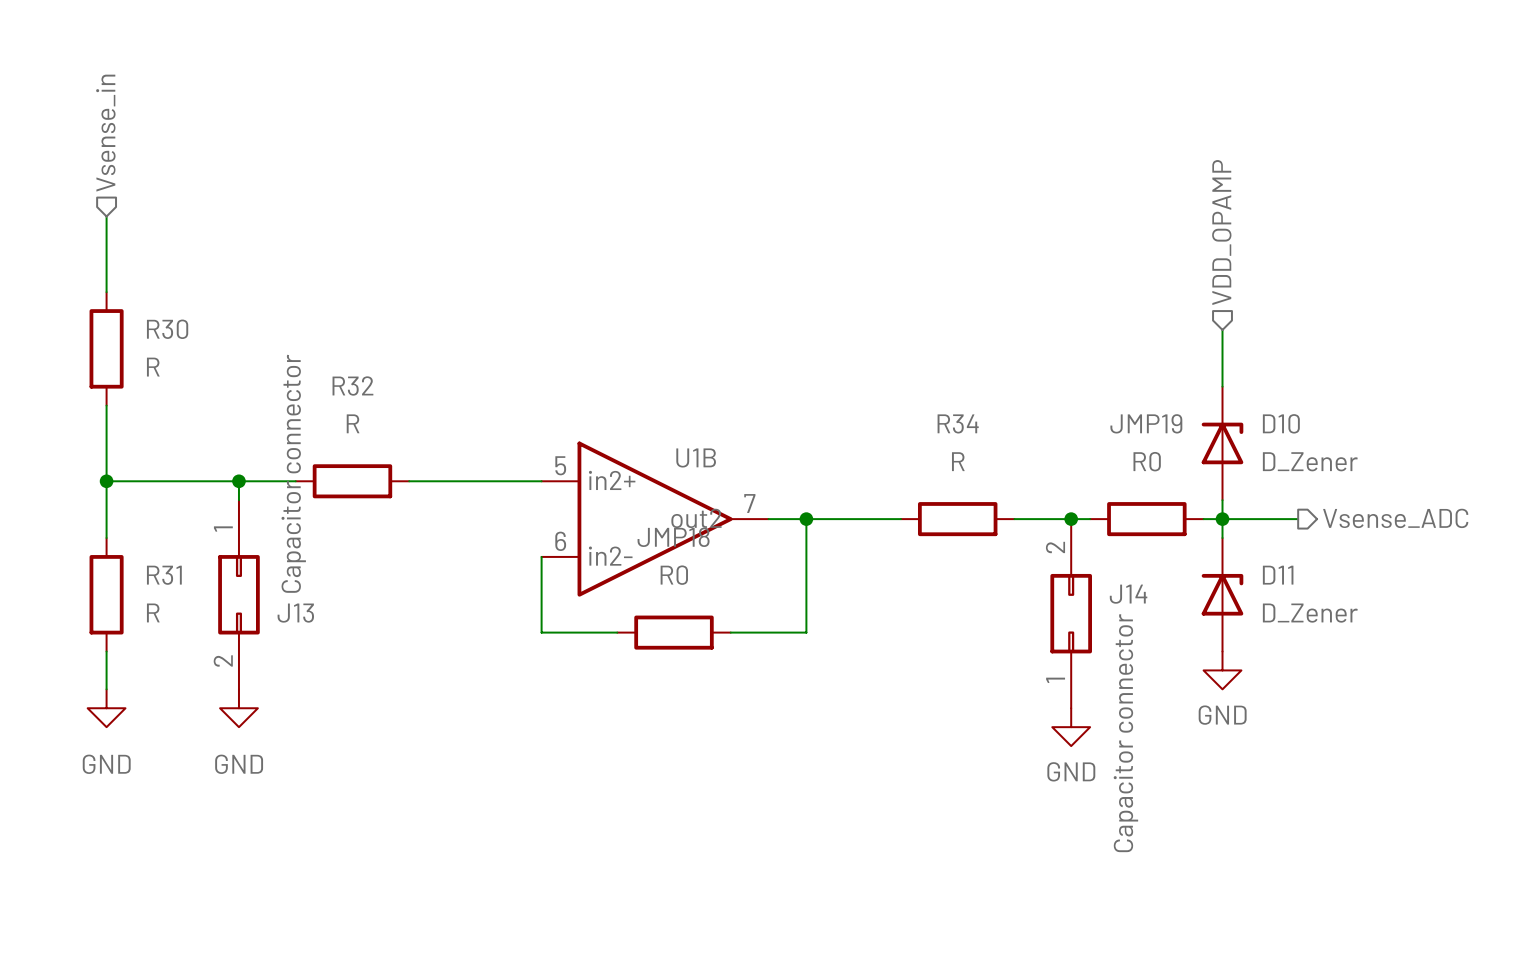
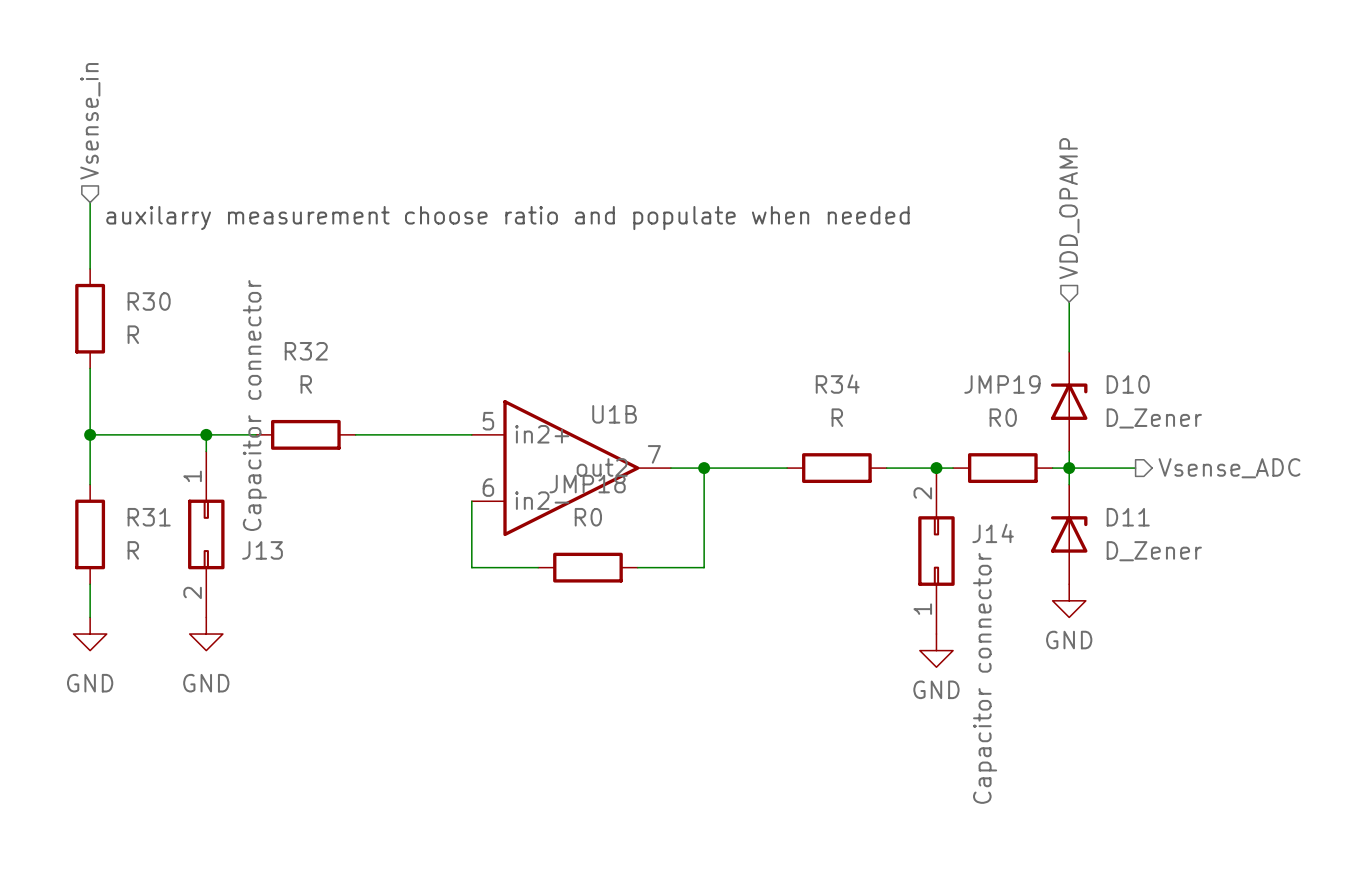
text: none -> auxilarry measurement choose ratio and populate when needed (507, 218)

